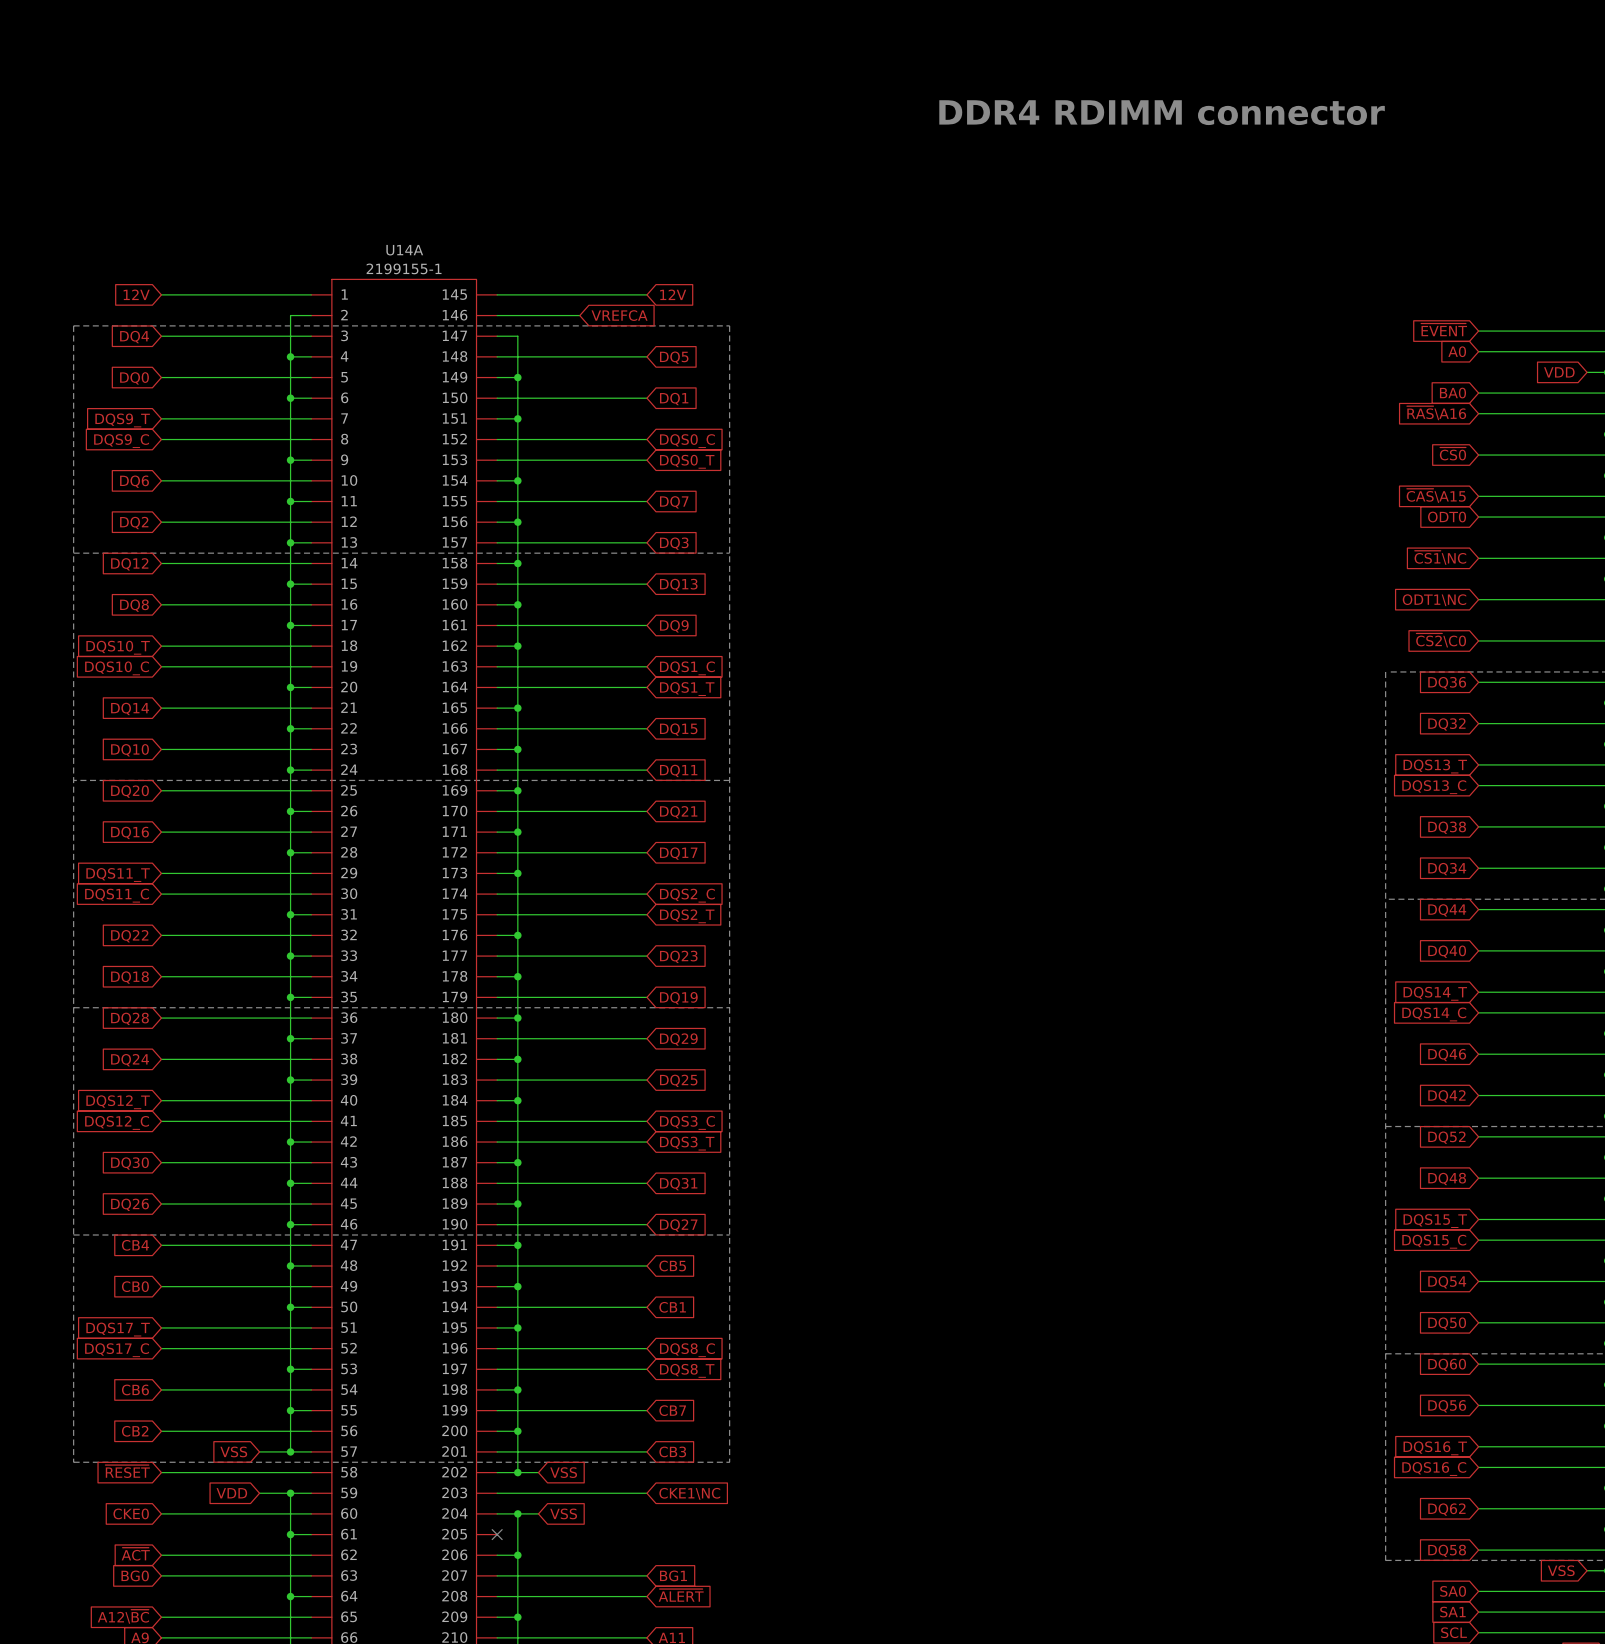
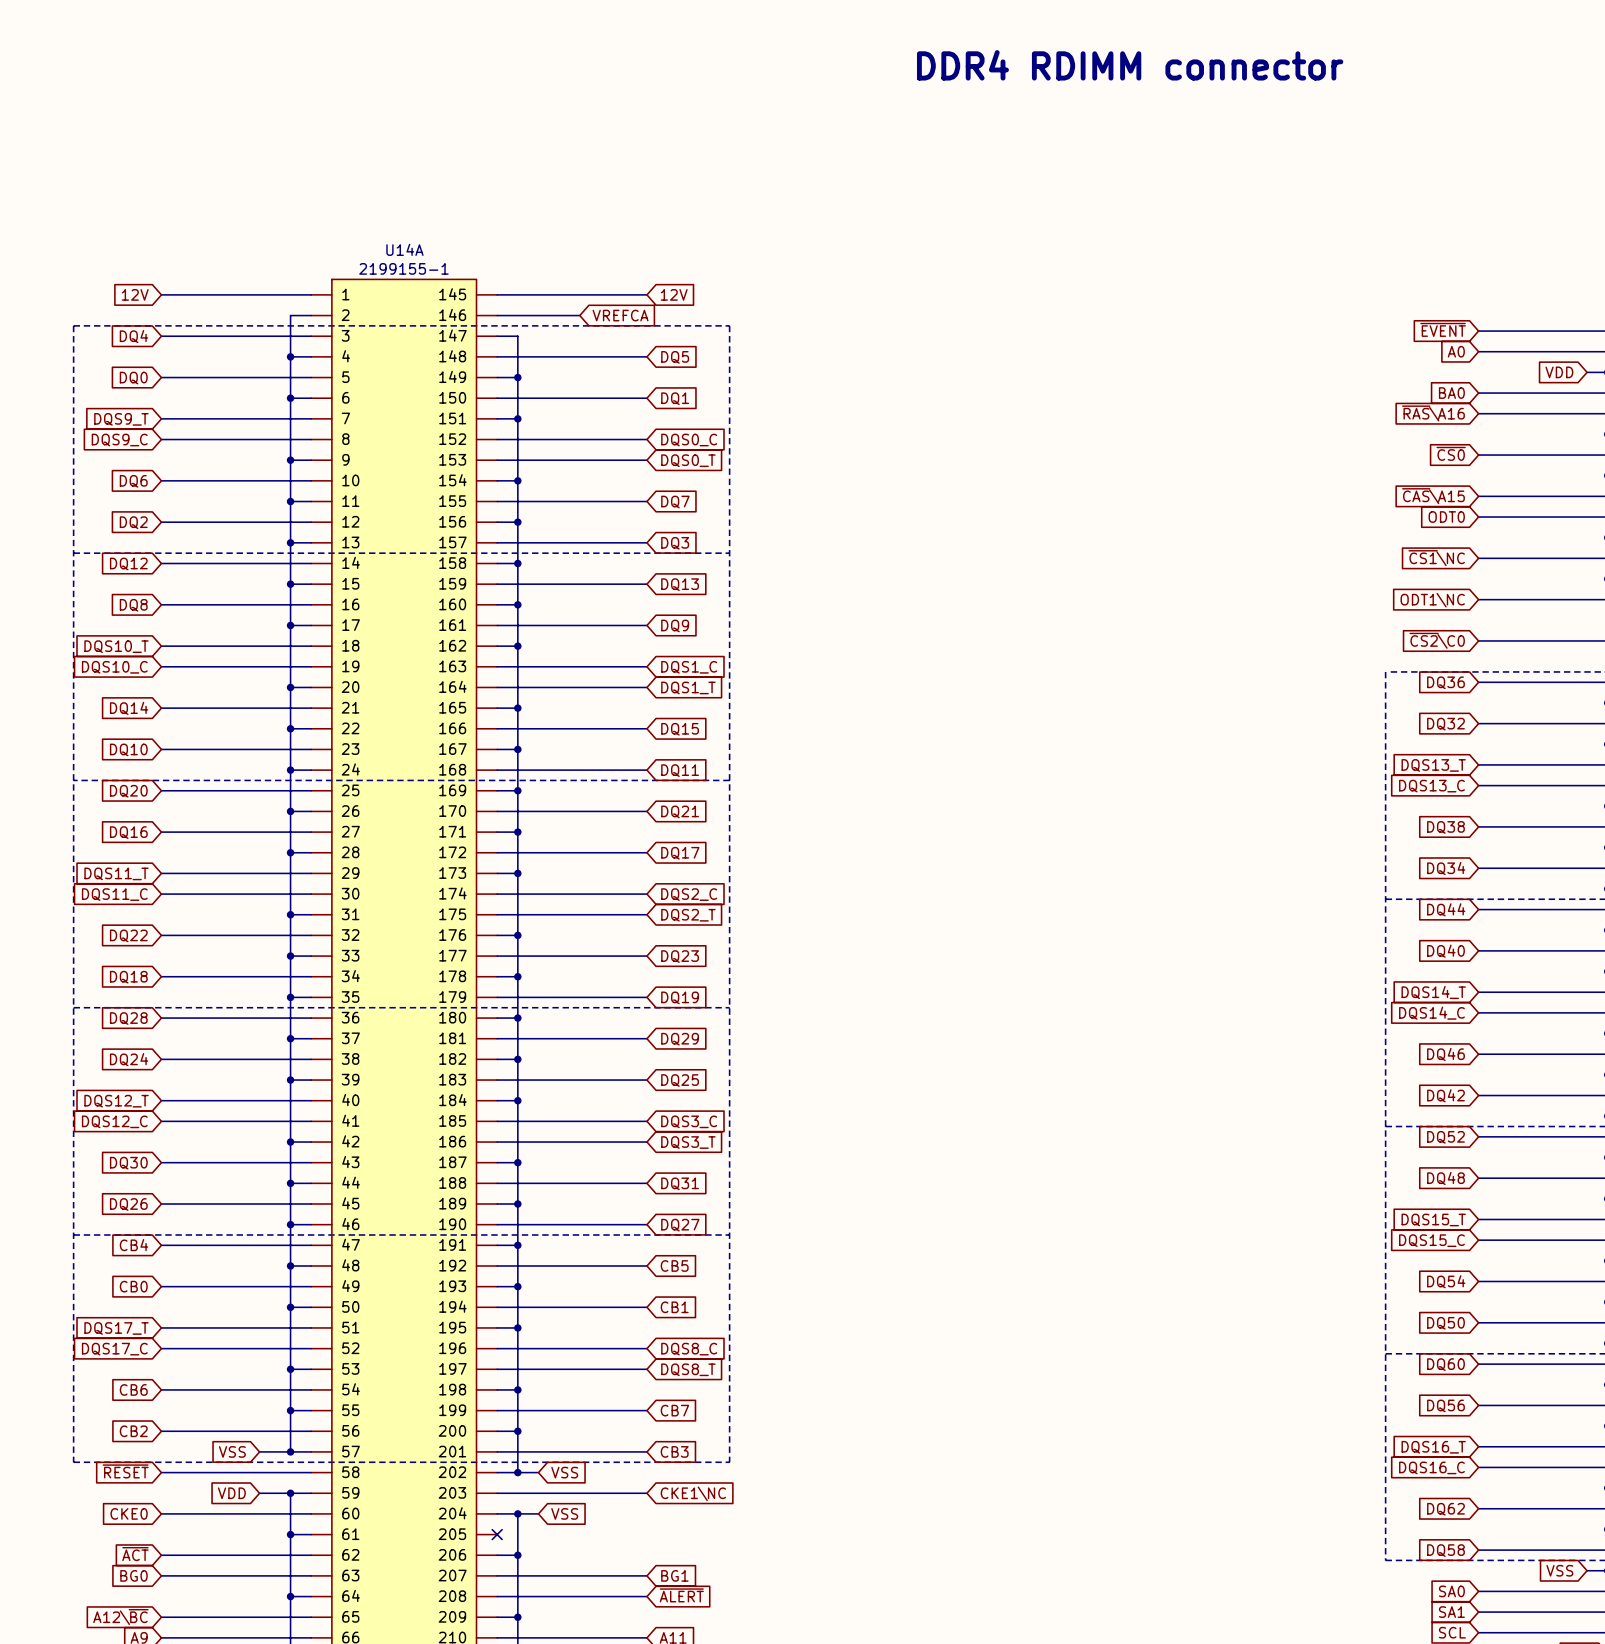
text position: DDR4 RDIMM connector (1162, 112) -> DDR4 RDIMM connector (1130, 65)

